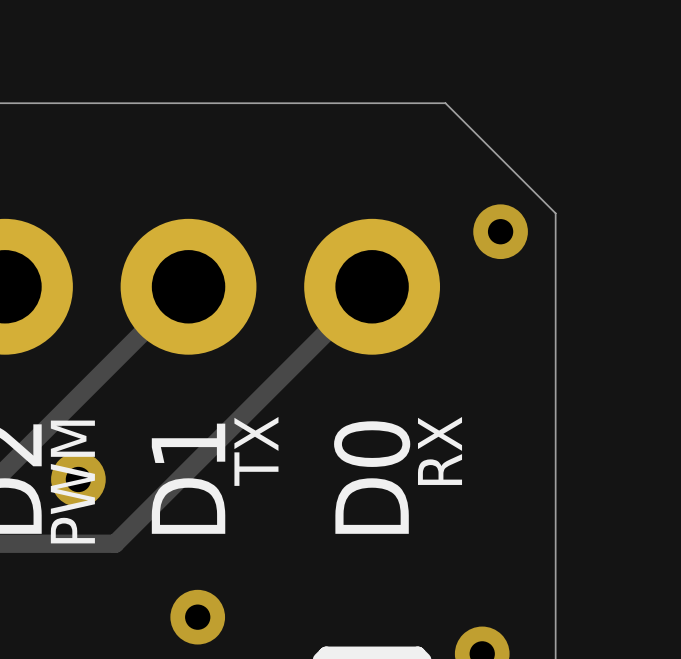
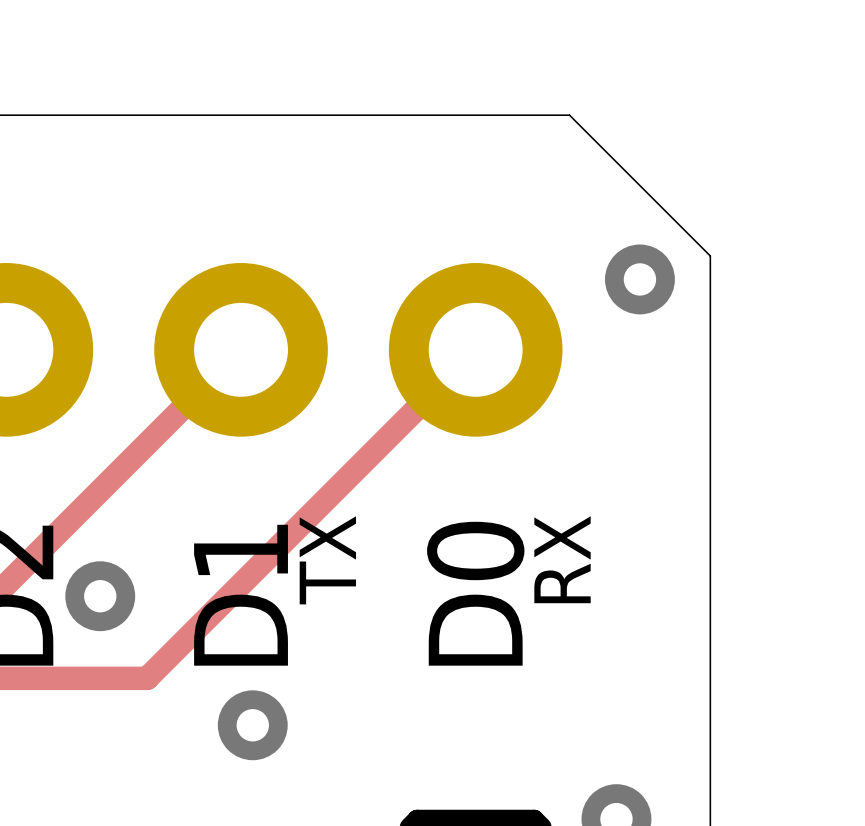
text: PWM (72, 481) -> none
via position: (197, 617) -> (252, 725)

